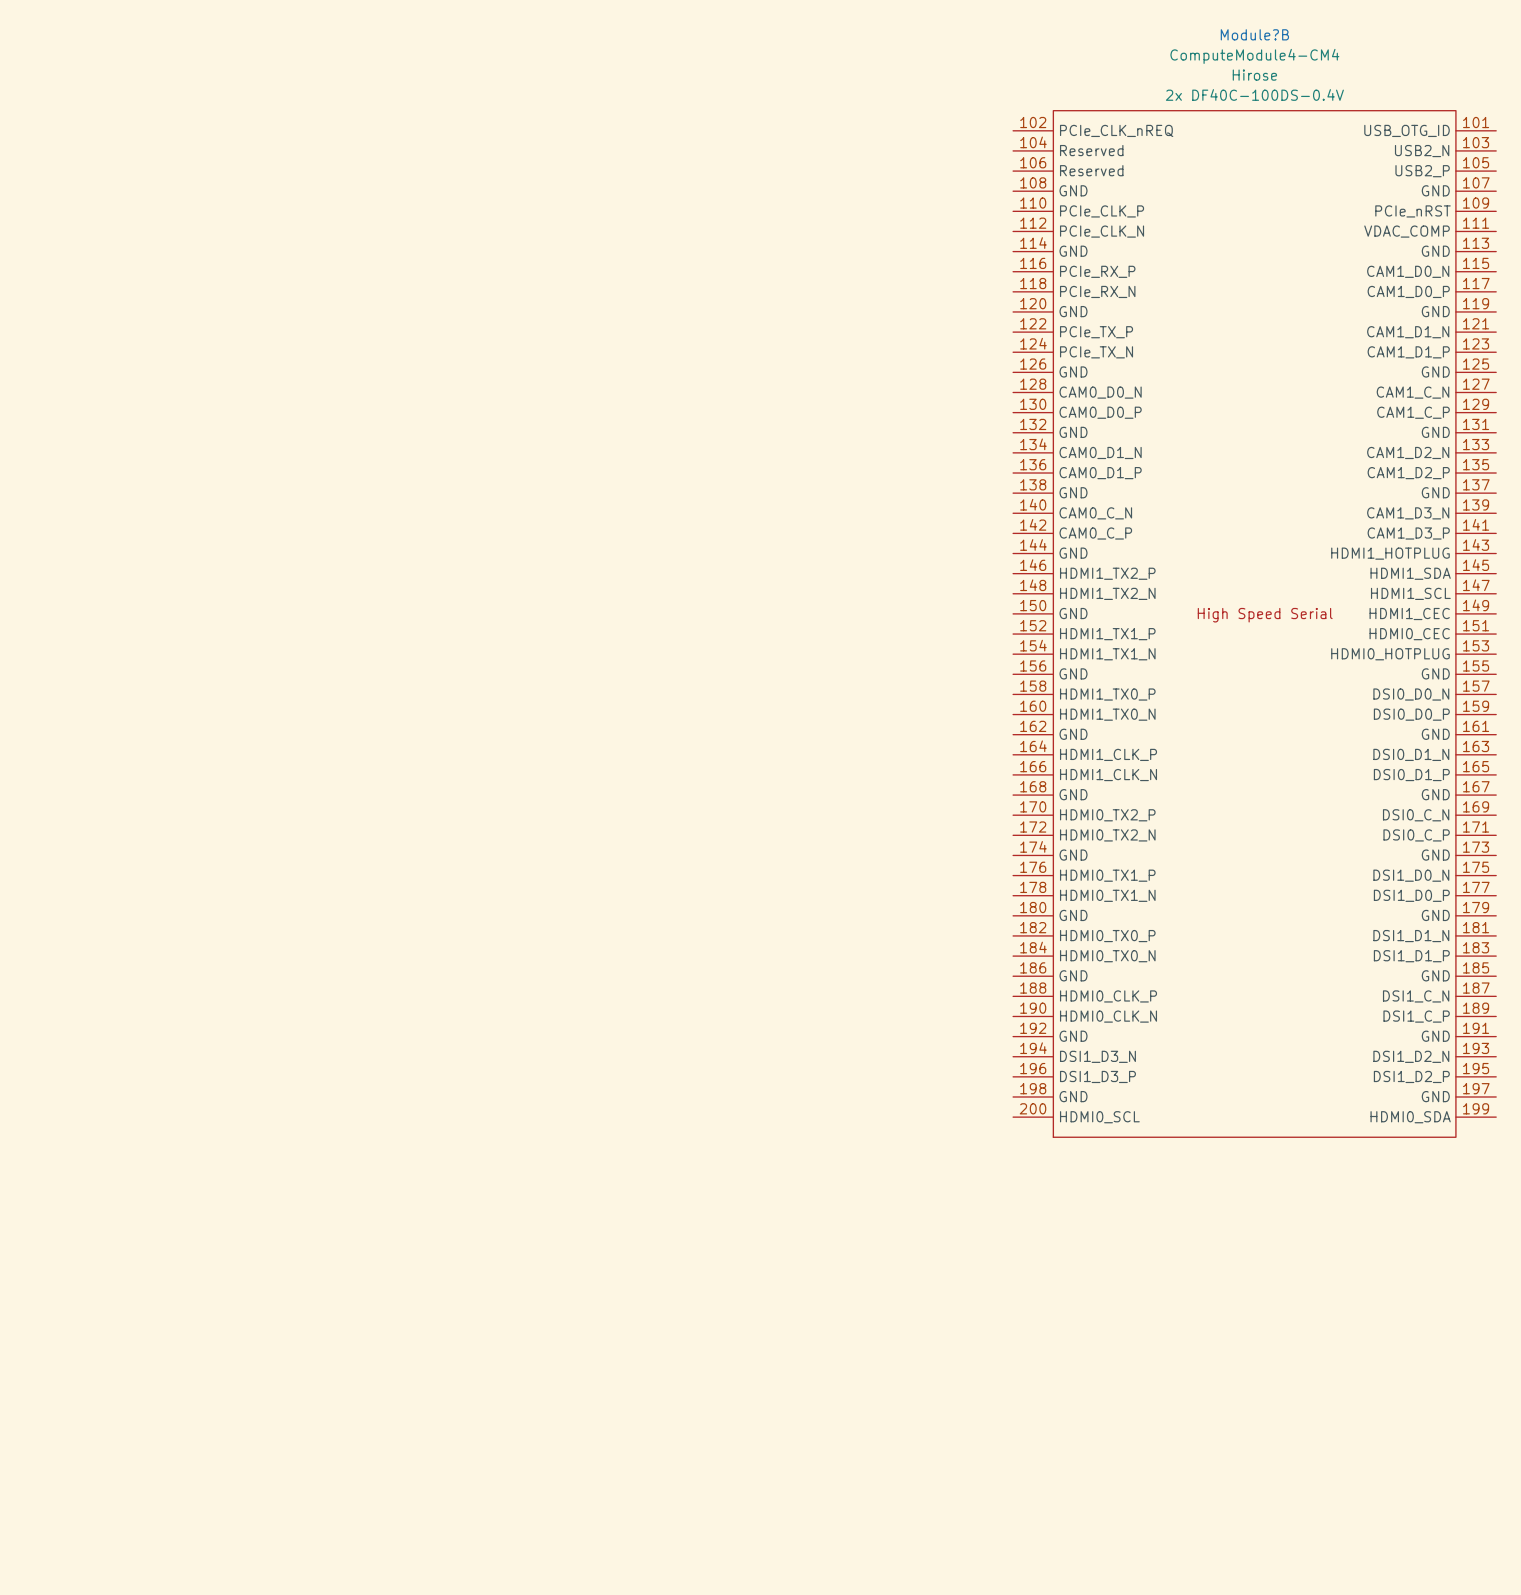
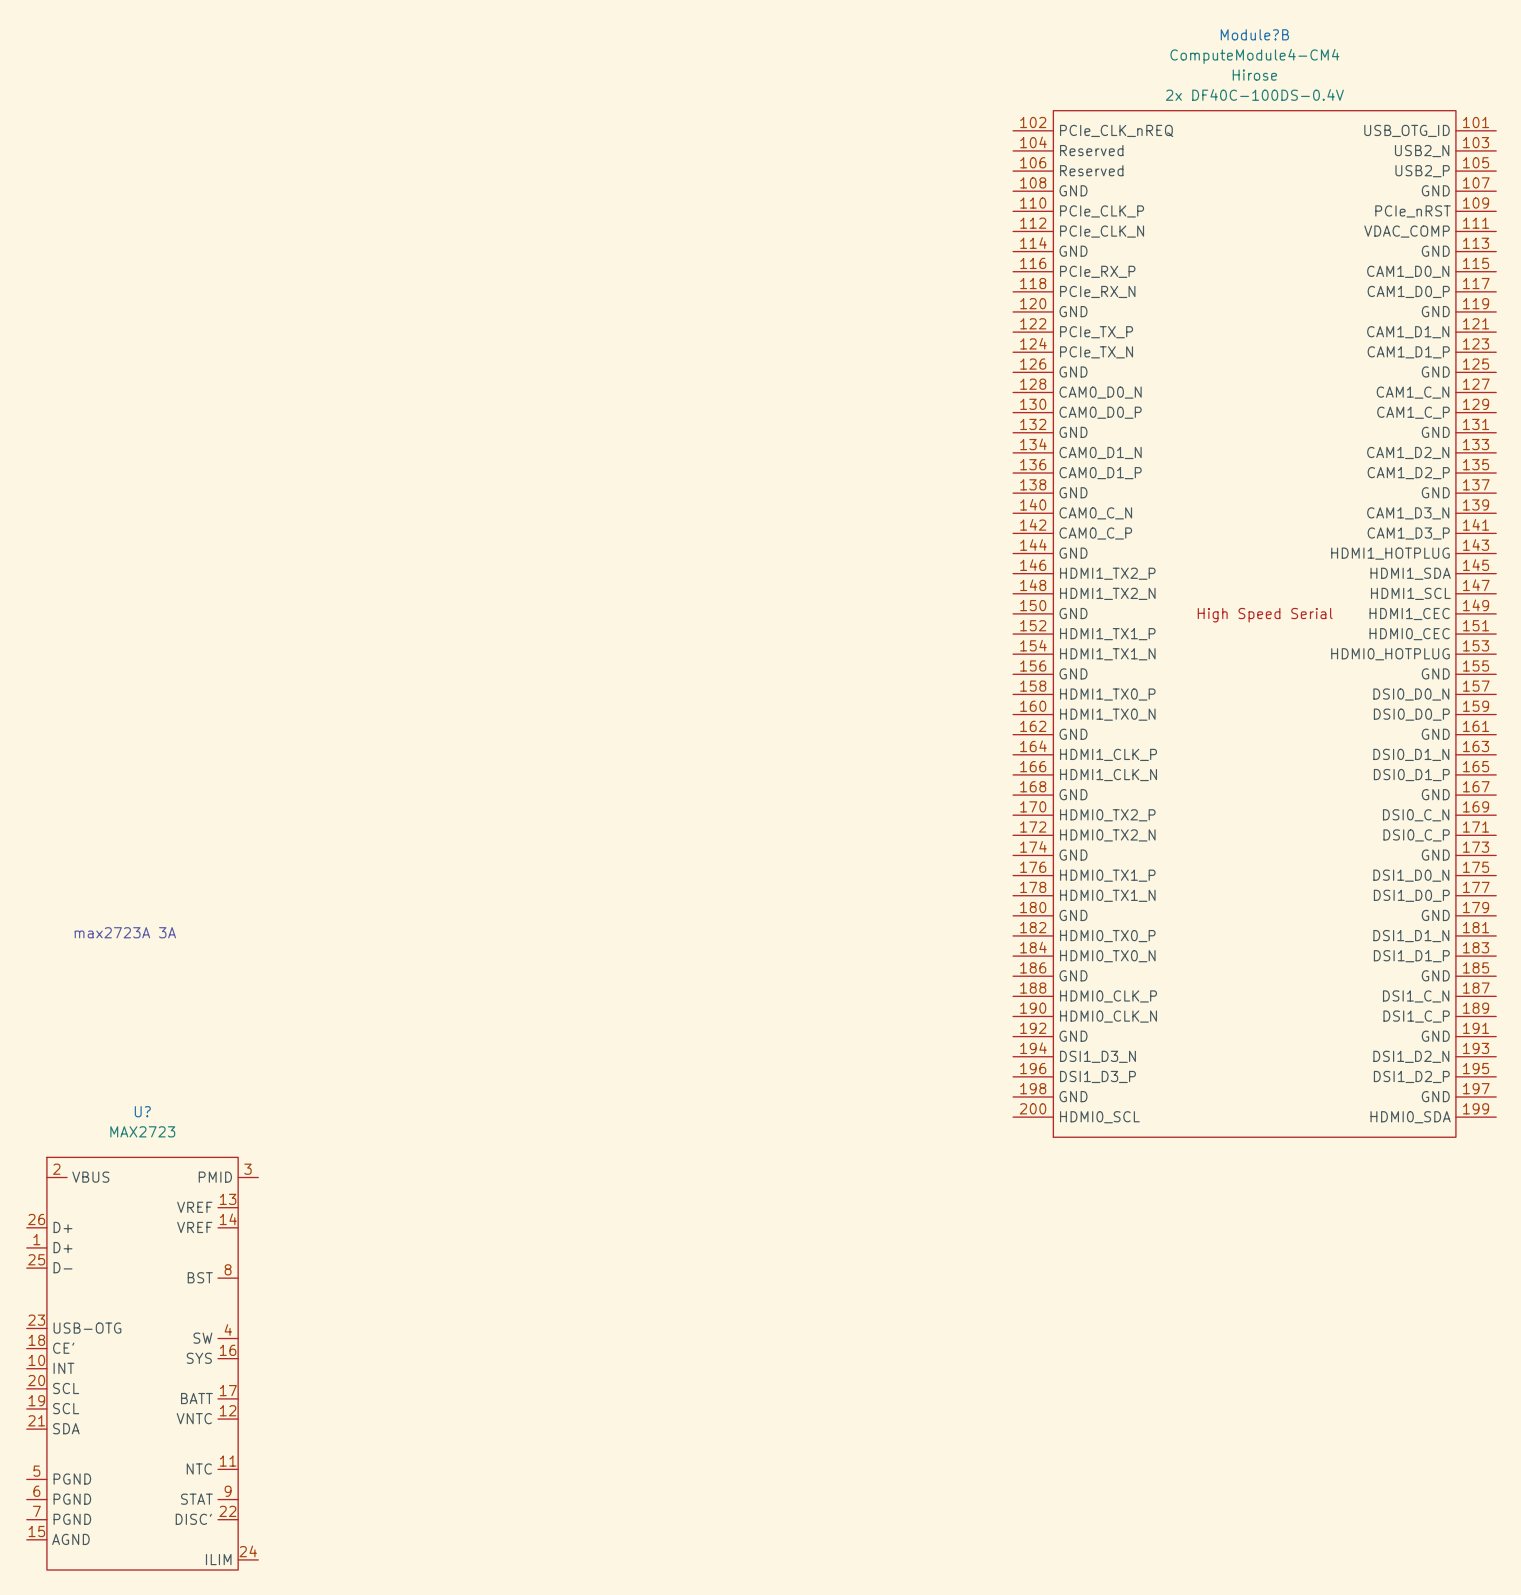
text: none -> max2723A 3A (125, 932)
U?: none -> MAX2723 (142, 1363)

